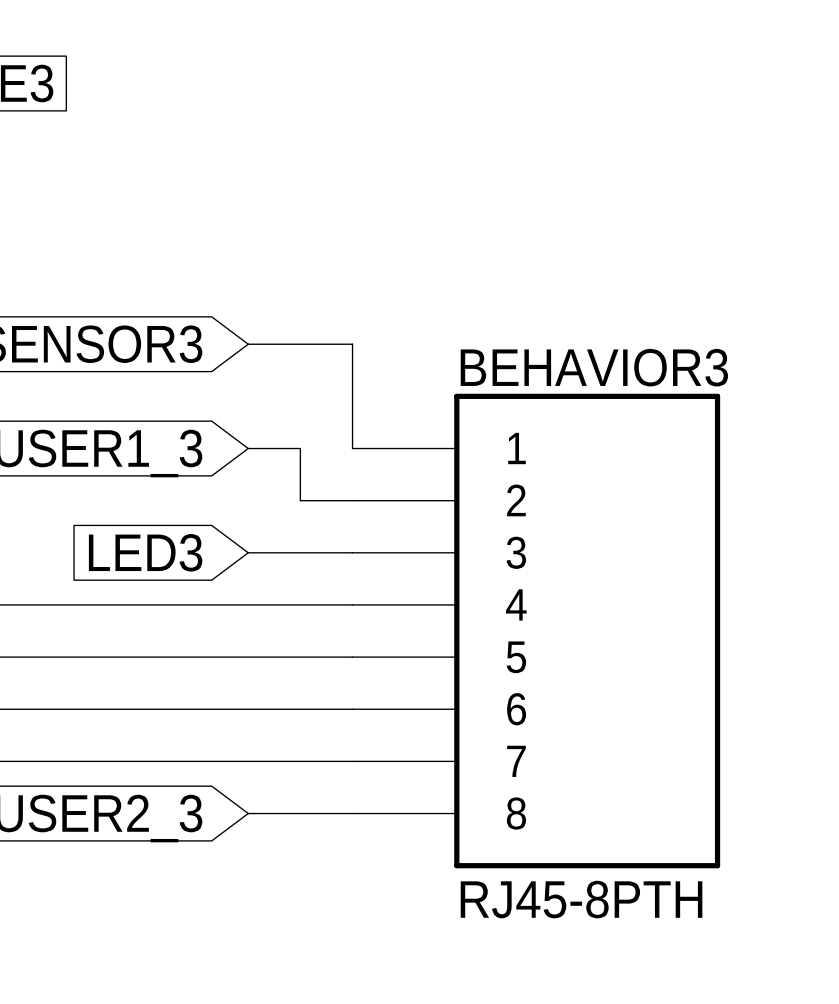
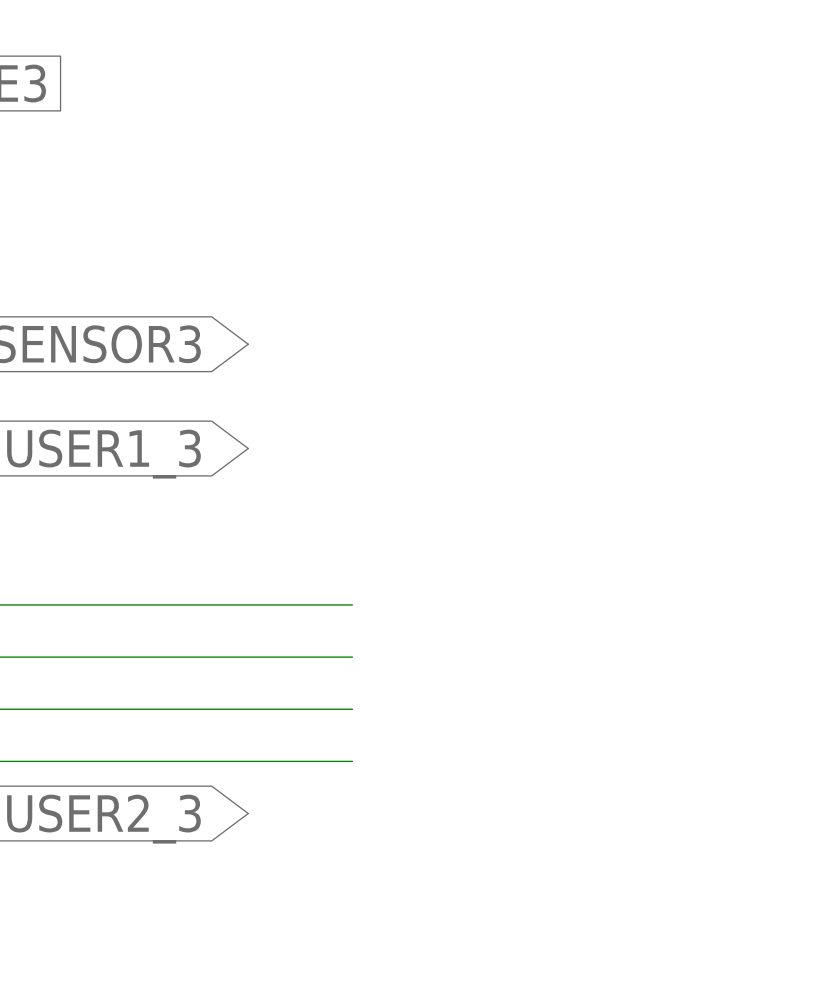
wire: (248, 344) (352, 344) (352, 448) -> none
wire: (248, 448) (300, 448) (300, 500) (352, 500) -> none
global label: LED3 (145, 552) -> none
wire: (248, 552) (352, 552) -> none
BEHAVIOR3: RJ45-8PTH (536, 631) -> none
wire: (248, 813) (352, 813) -> none

